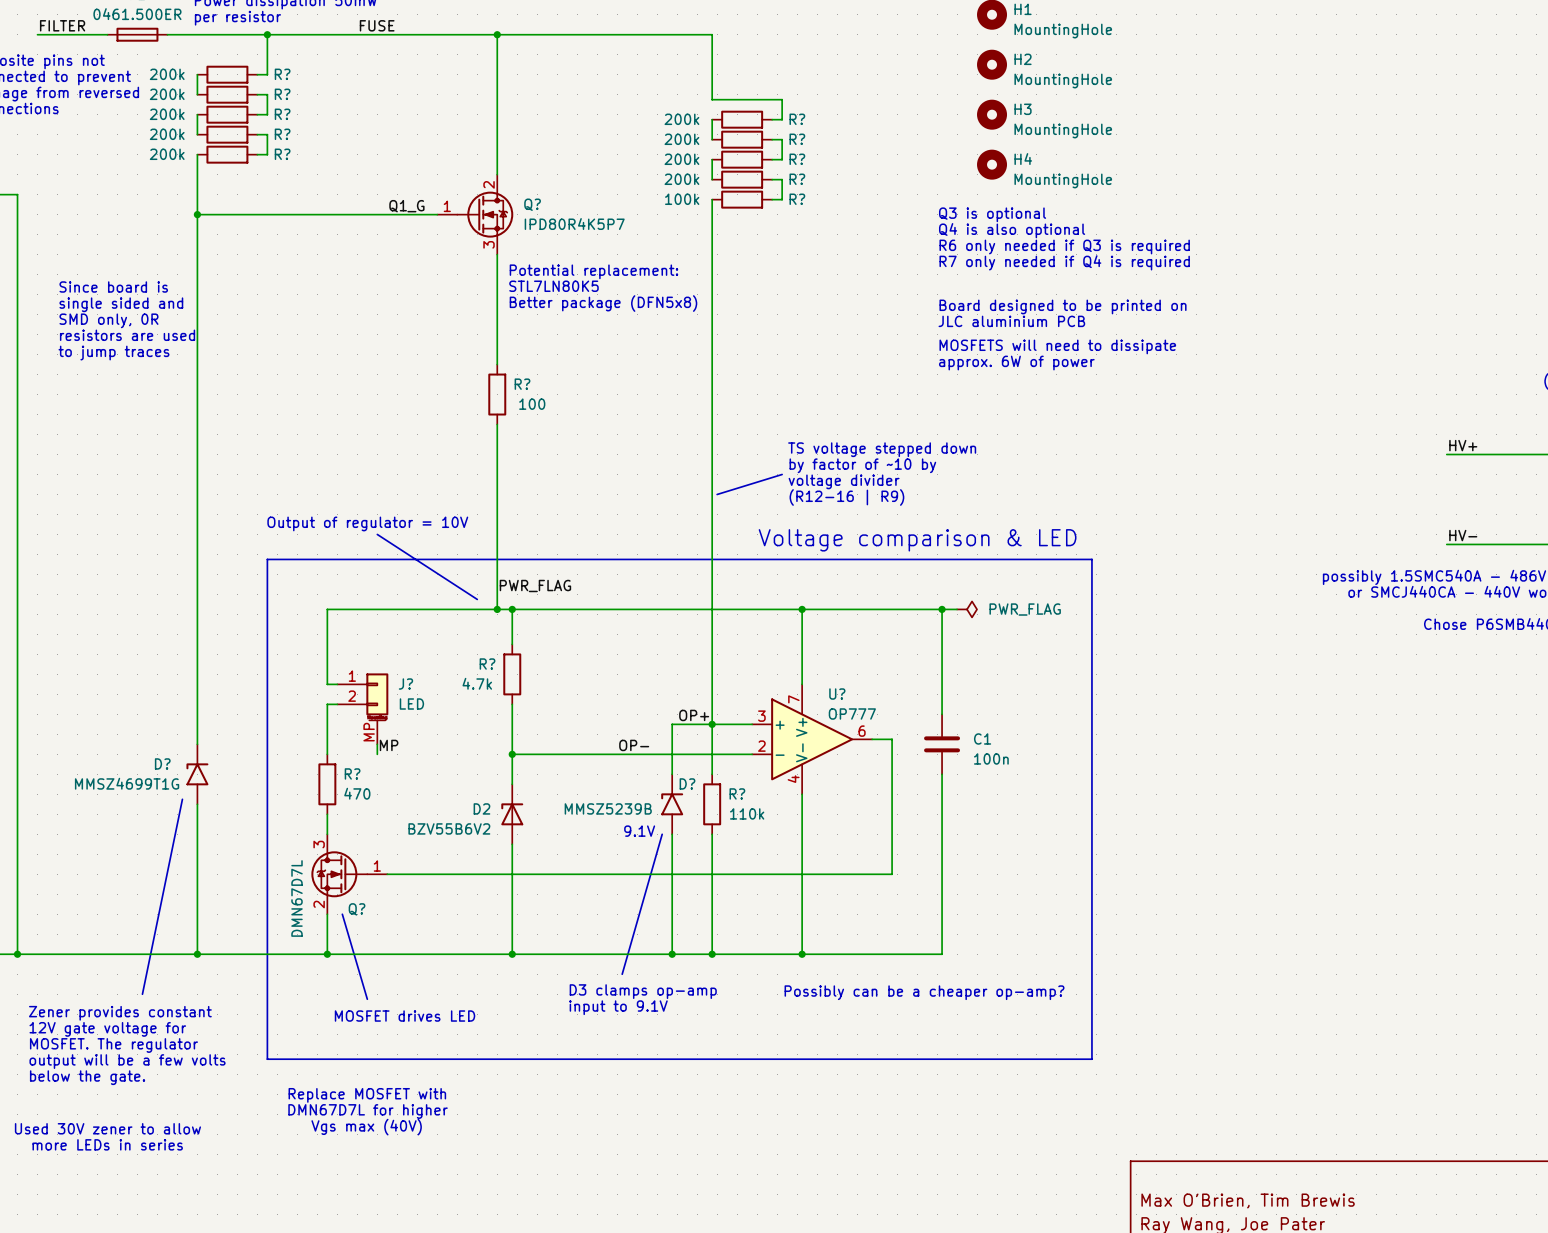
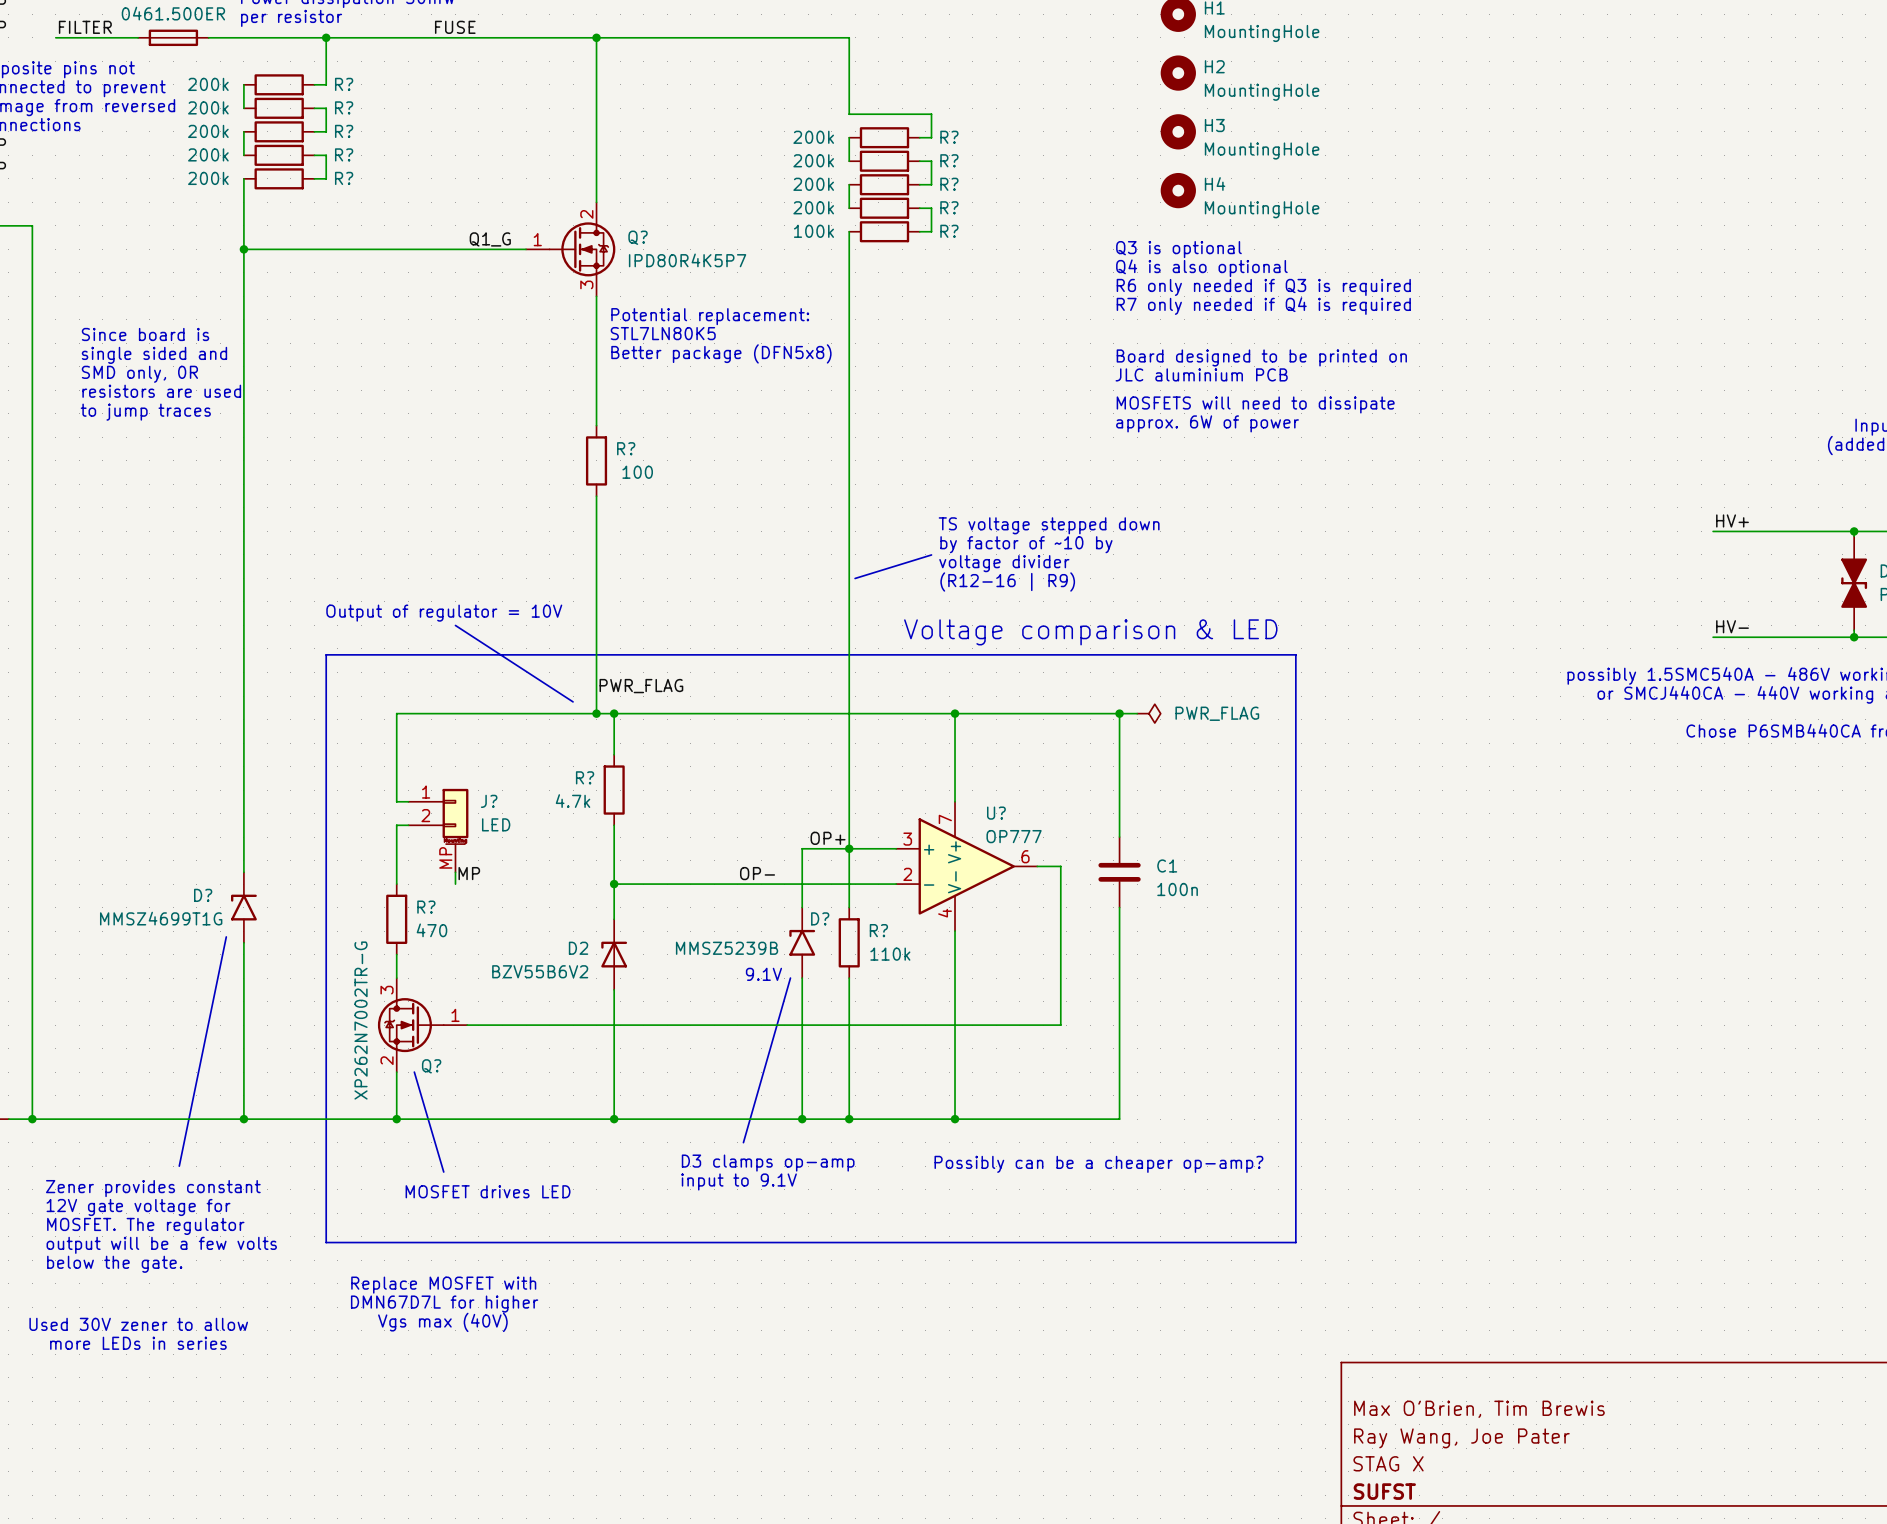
Q? value: DMN67D7L (297, 898) -> XP262N7002TR-G (361, 1020)

